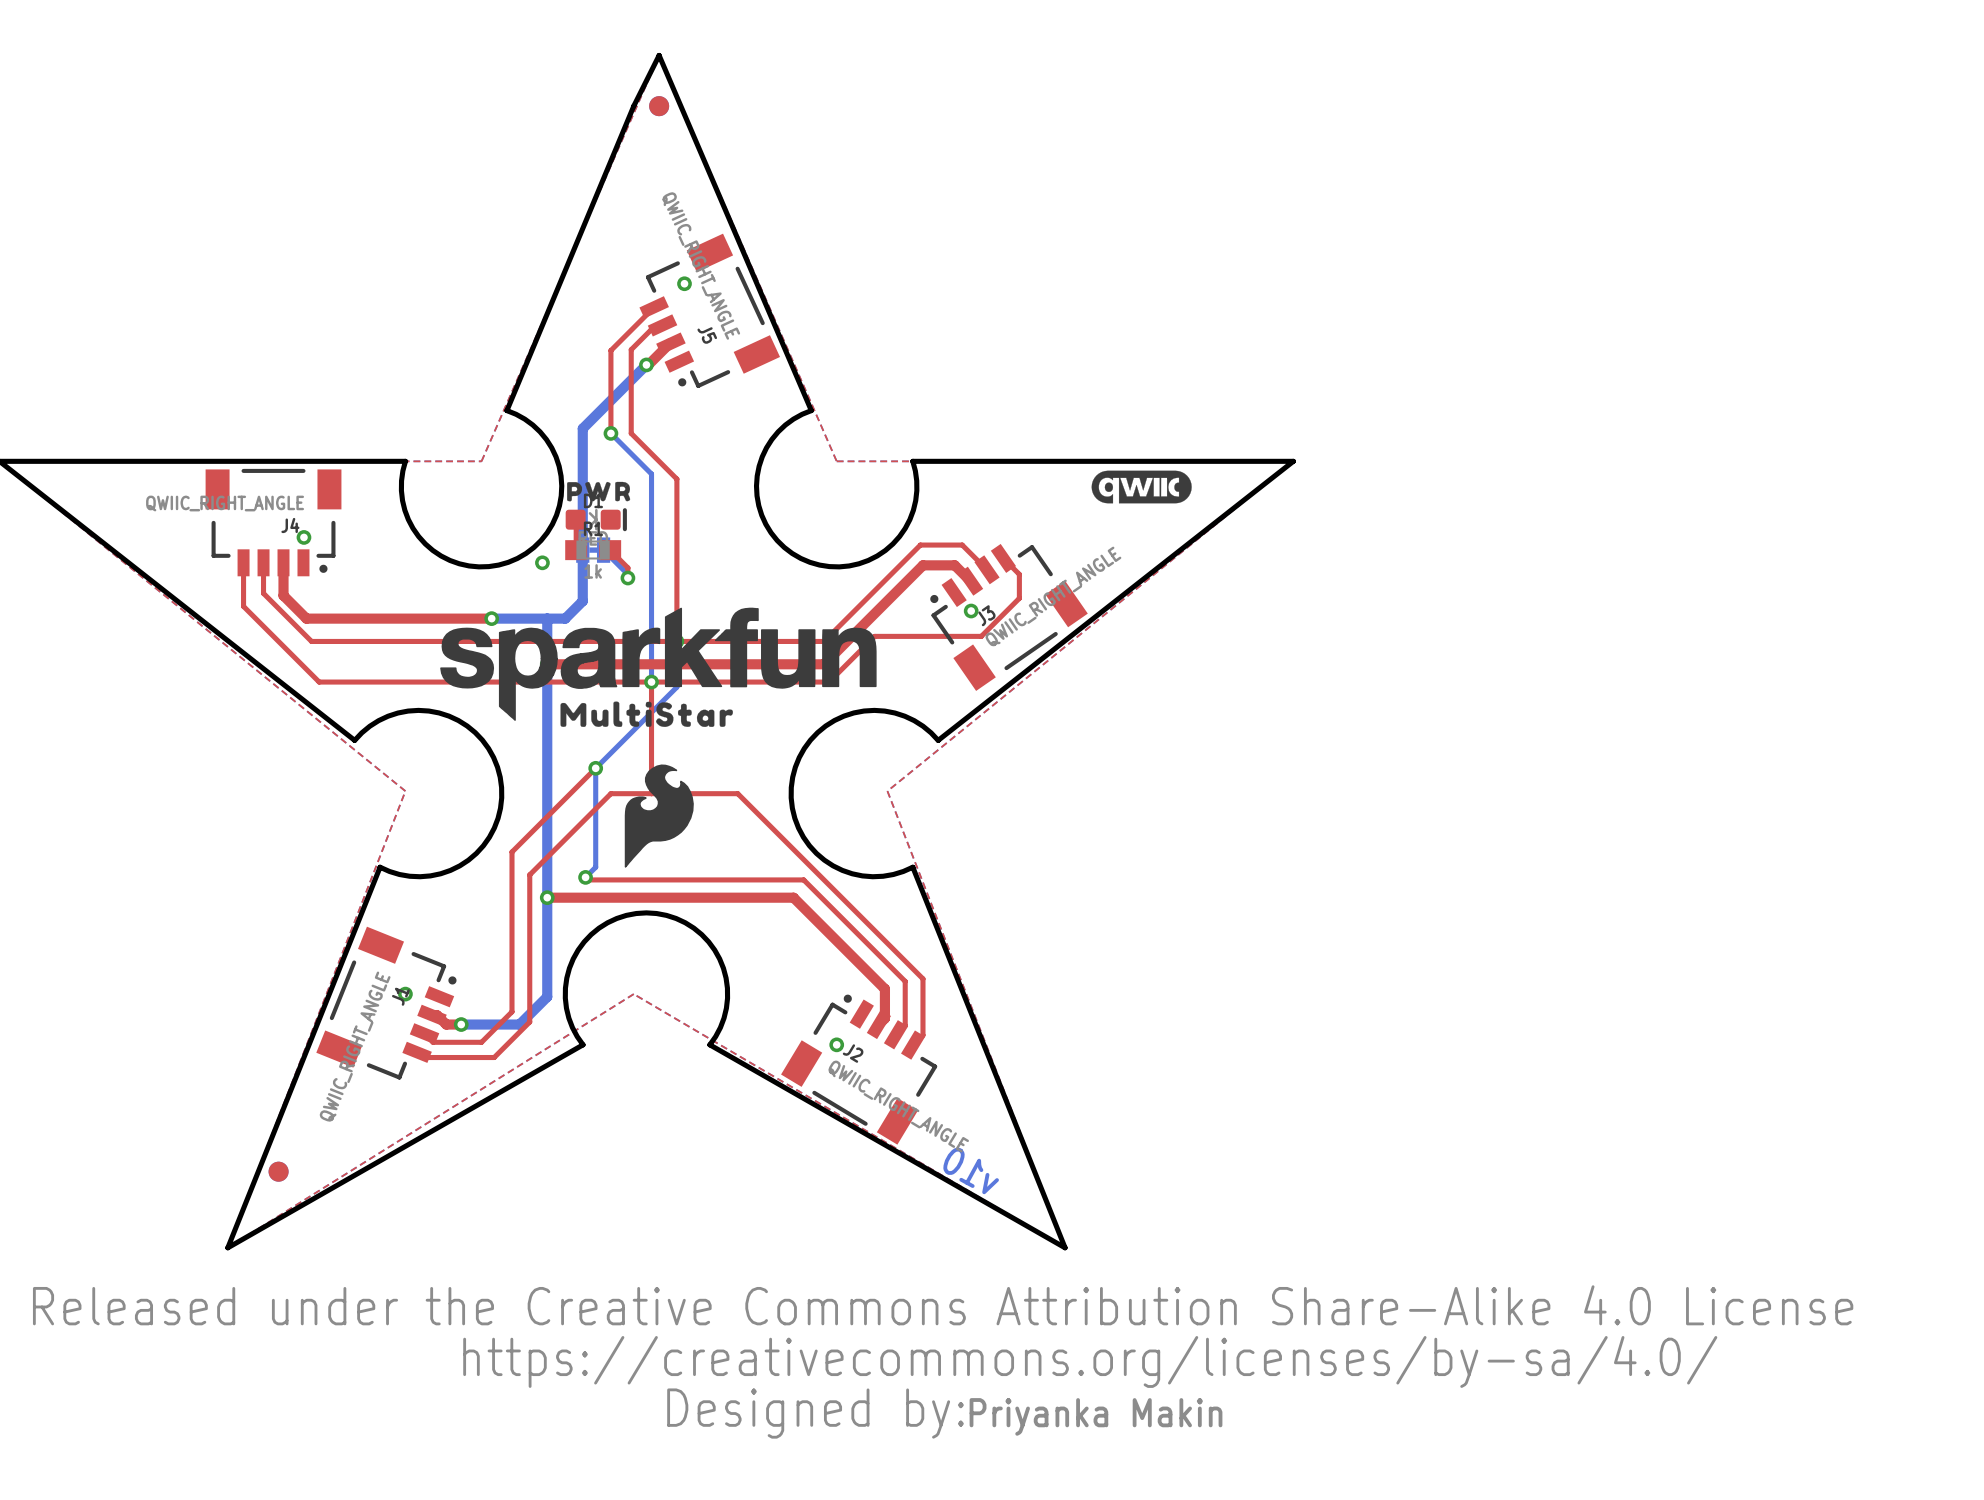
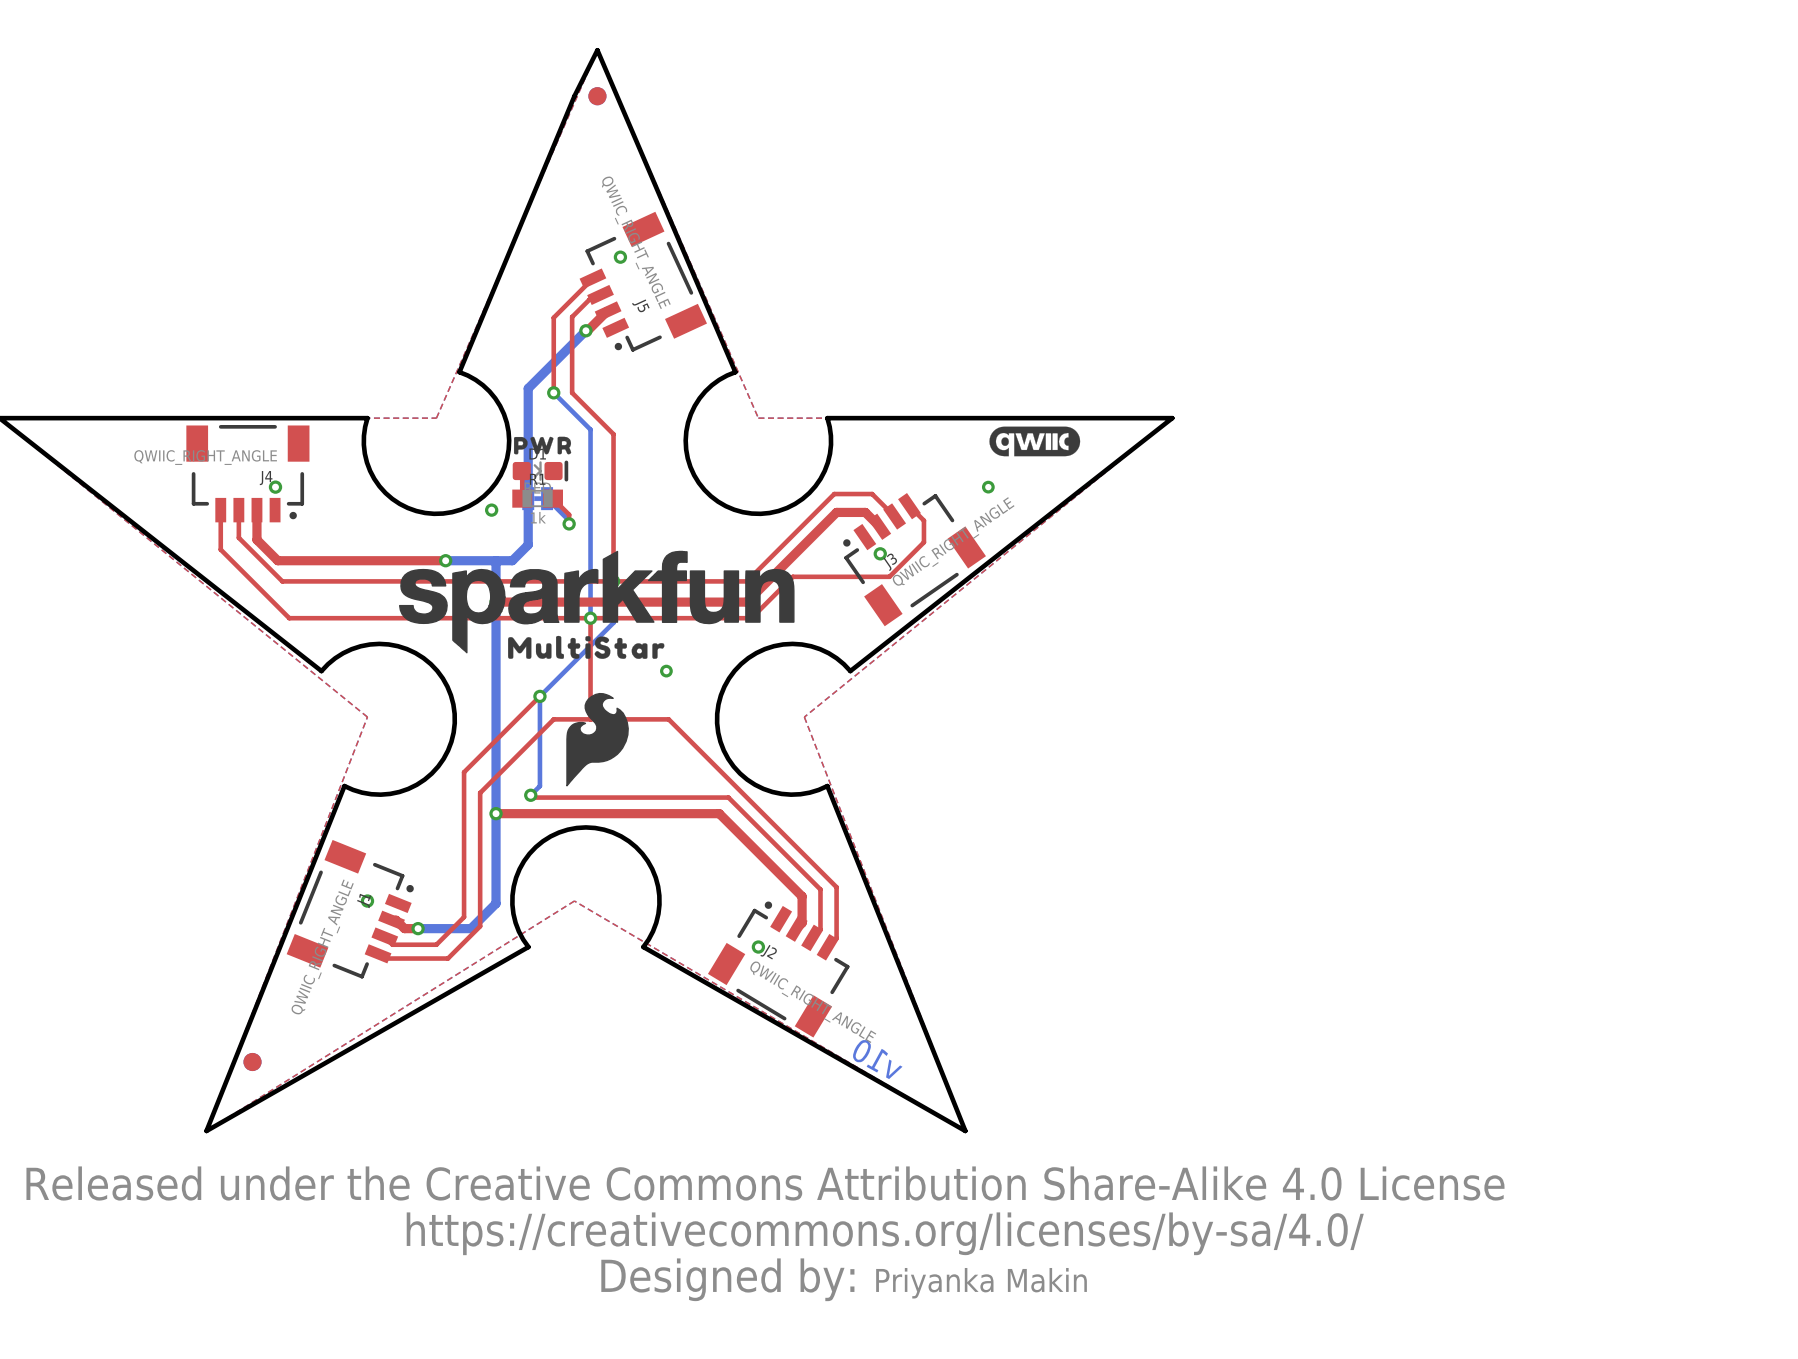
via: none -> (988, 487)
via: none -> (666, 671)

